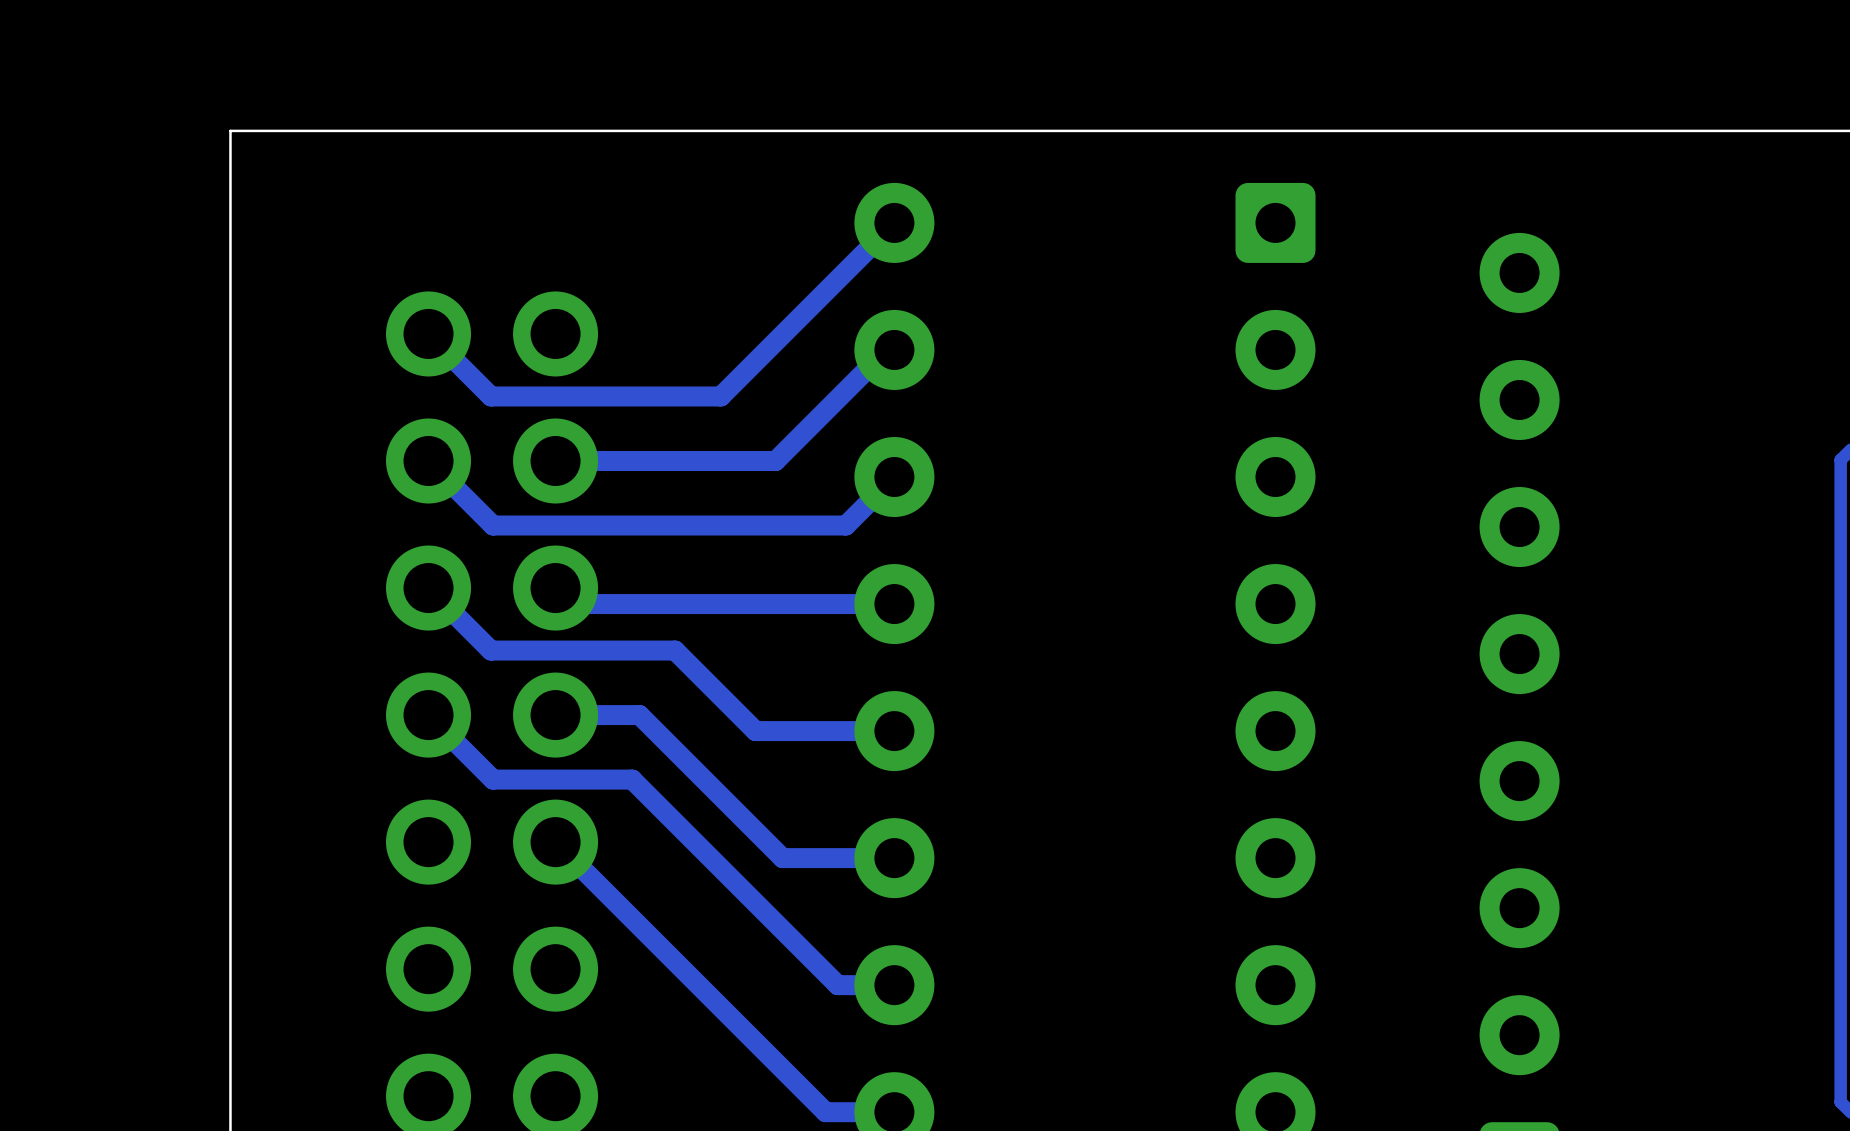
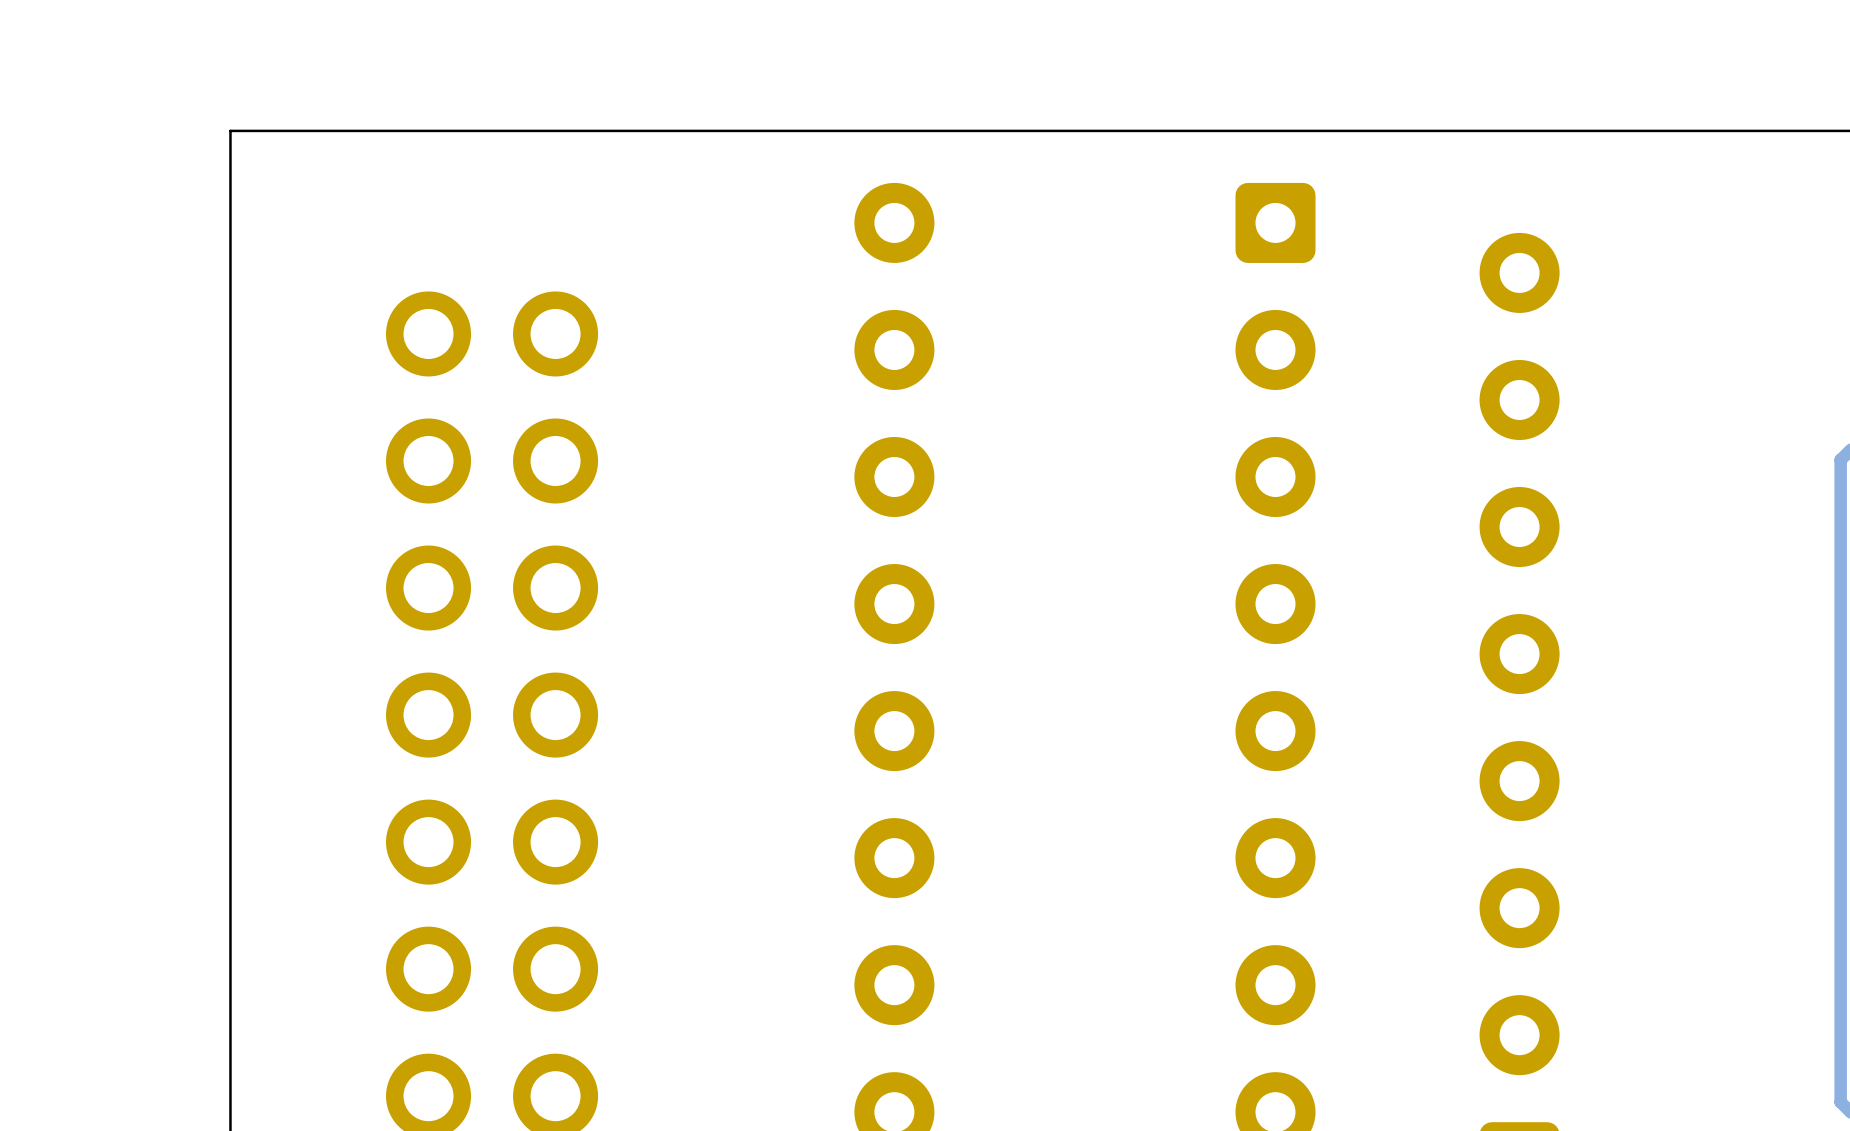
track: (894, 222) (720, 396) (491, 396) (428, 333) -> none
track: (894, 349) (886, 349) (775, 461) (555, 461) -> none
track: (428, 461) (493, 525) (845, 525) (894, 477) -> none
track: (428, 588) (491, 650) (675, 650) (755, 731) (894, 731) -> none
track: (555, 588) (571, 604) (894, 604) -> none
track: (428, 715) (493, 779) (632, 779) (837, 985) (894, 985) -> none
track: (555, 715) (639, 715) (782, 858) (894, 858) -> none
track: (555, 842) (825, 1112) (894, 1112) -> none

